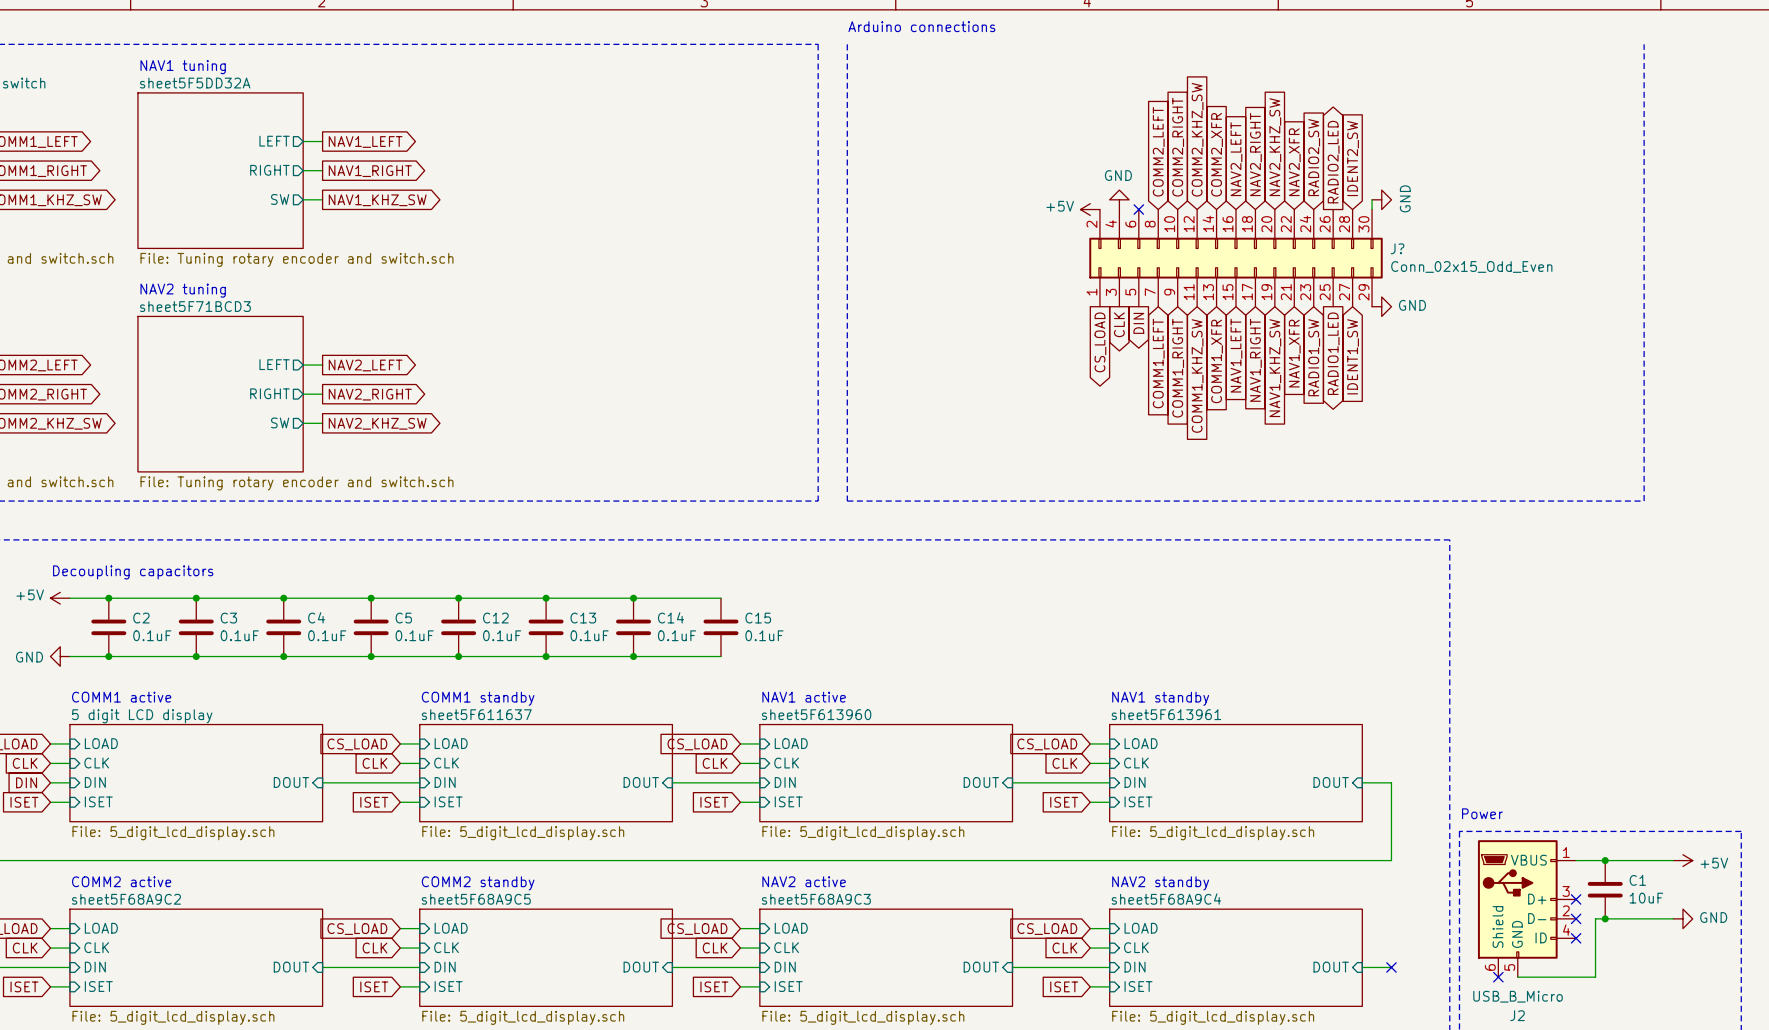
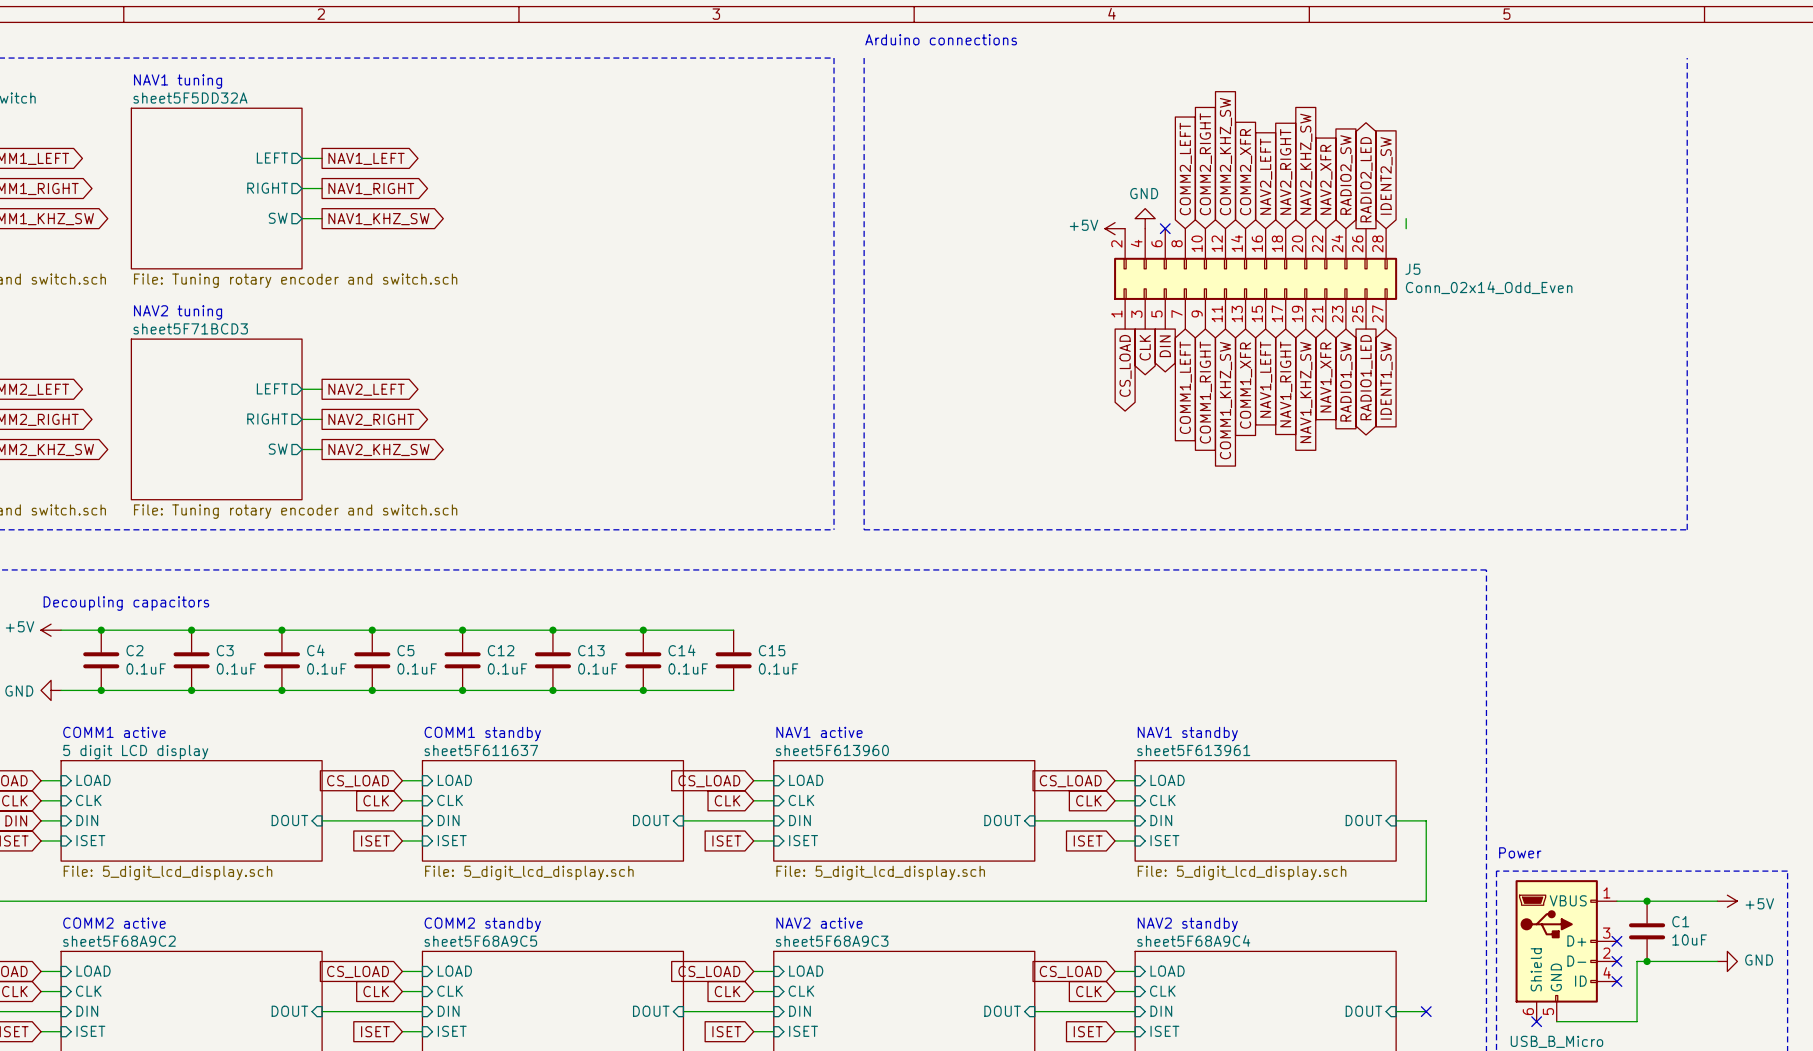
power symbol: GND (1381, 199) -> none
J5: none -> Conn_02x14_Odd_Even (1255, 278)
J?: Conn_02x15_Odd_Even (1235, 258) -> none
power symbol: GND (1381, 306) -> none

